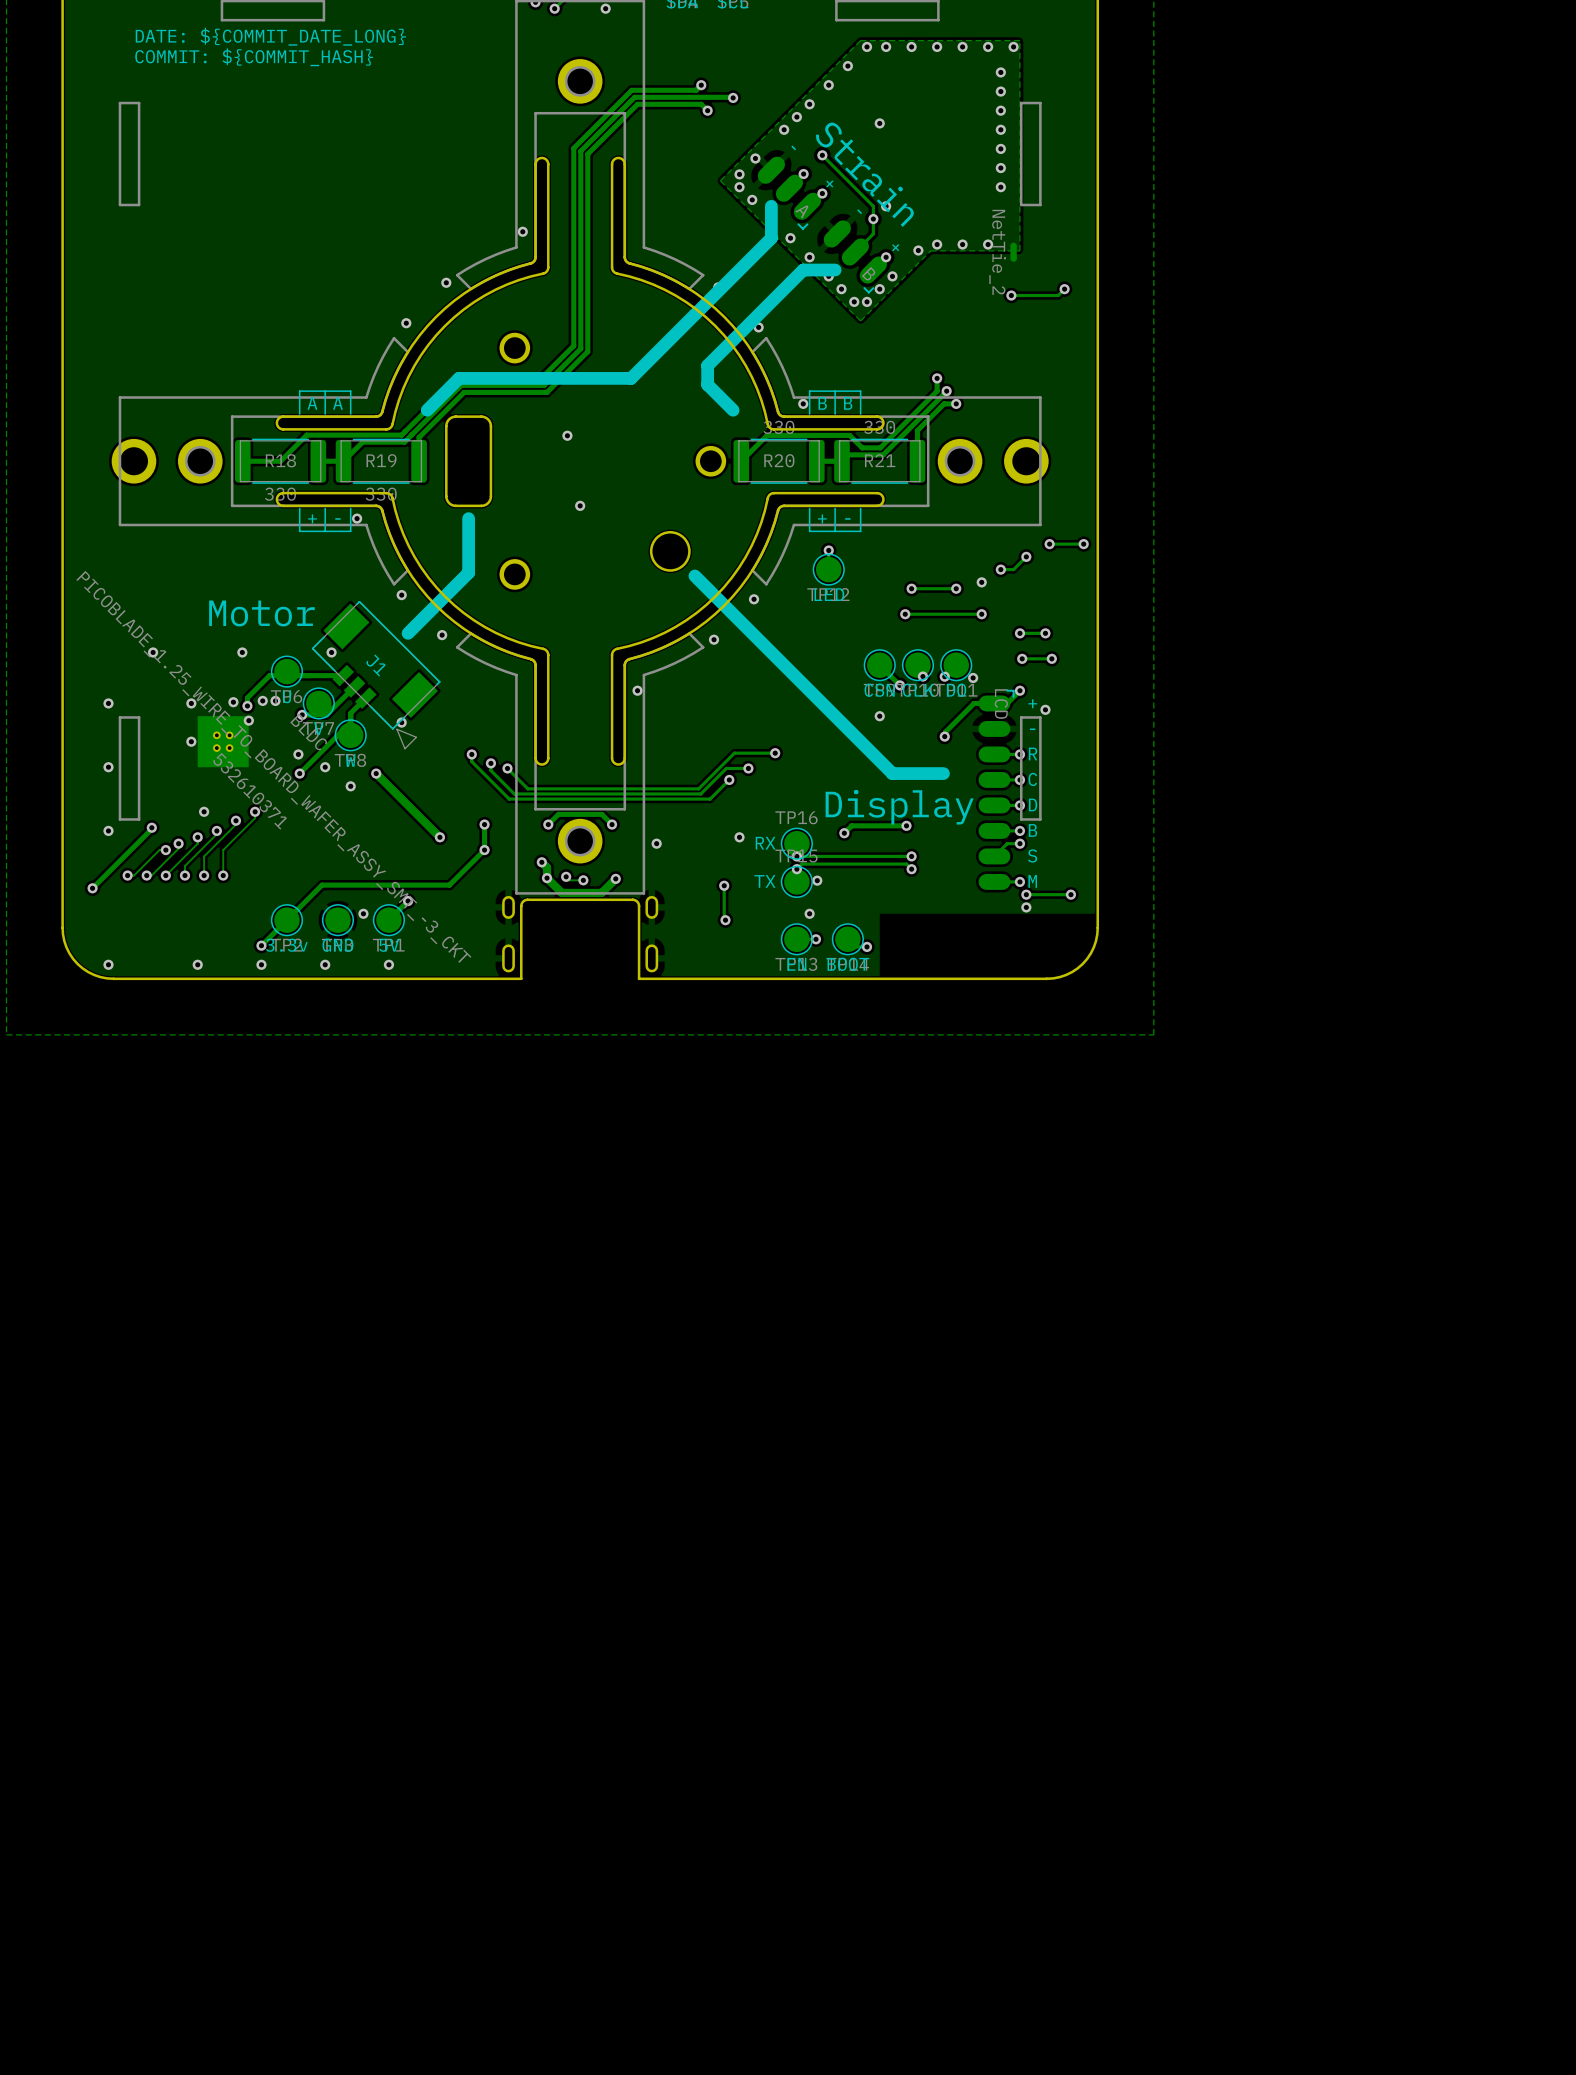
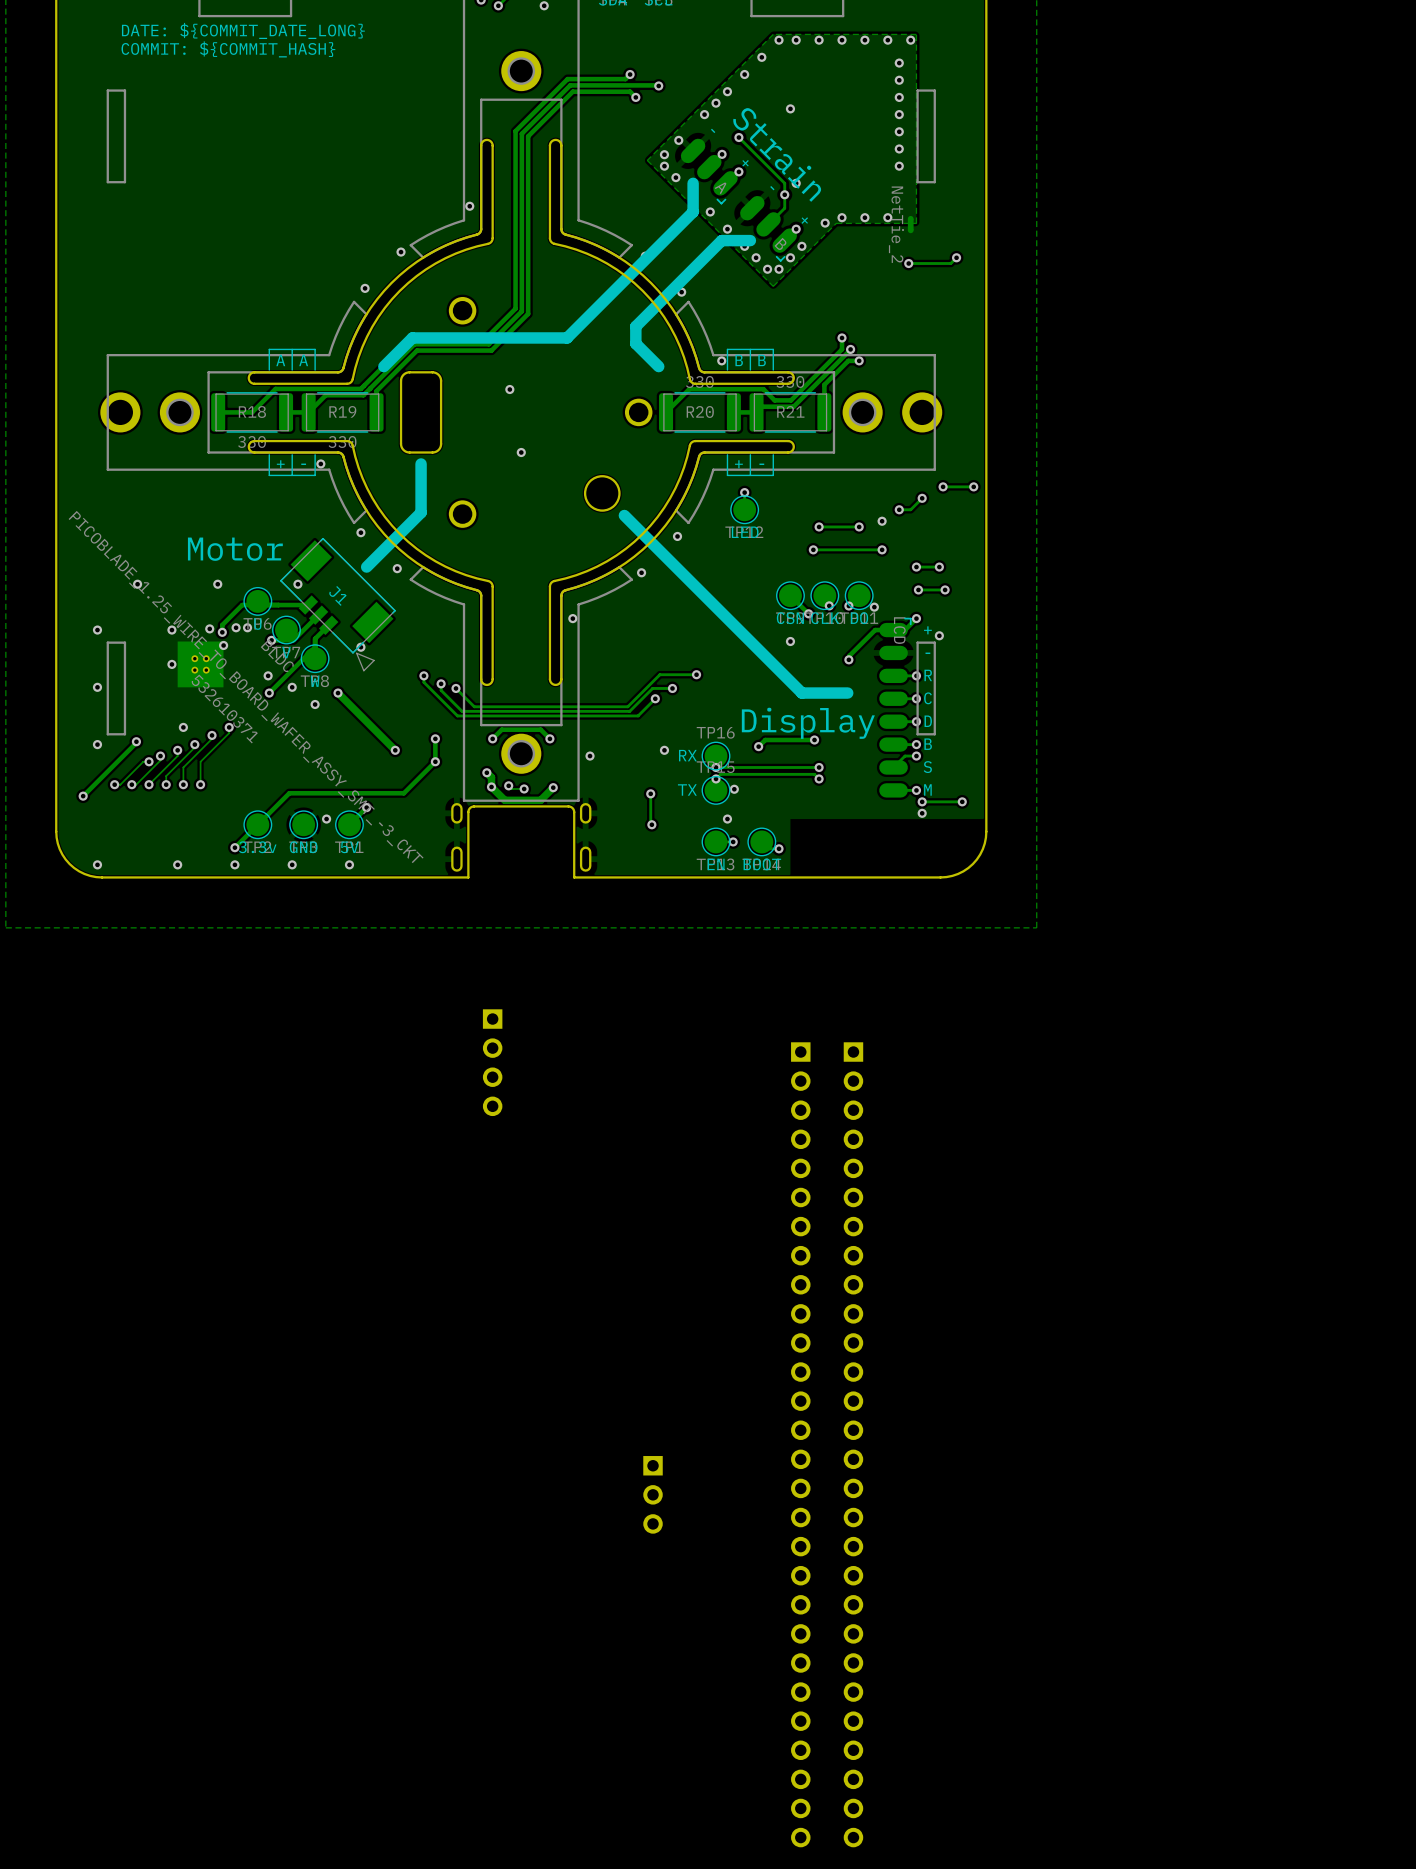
part: none -> (492, 1062)
part: none -> (800, 1444)
part: none -> (853, 1444)
part: none -> (653, 1494)

